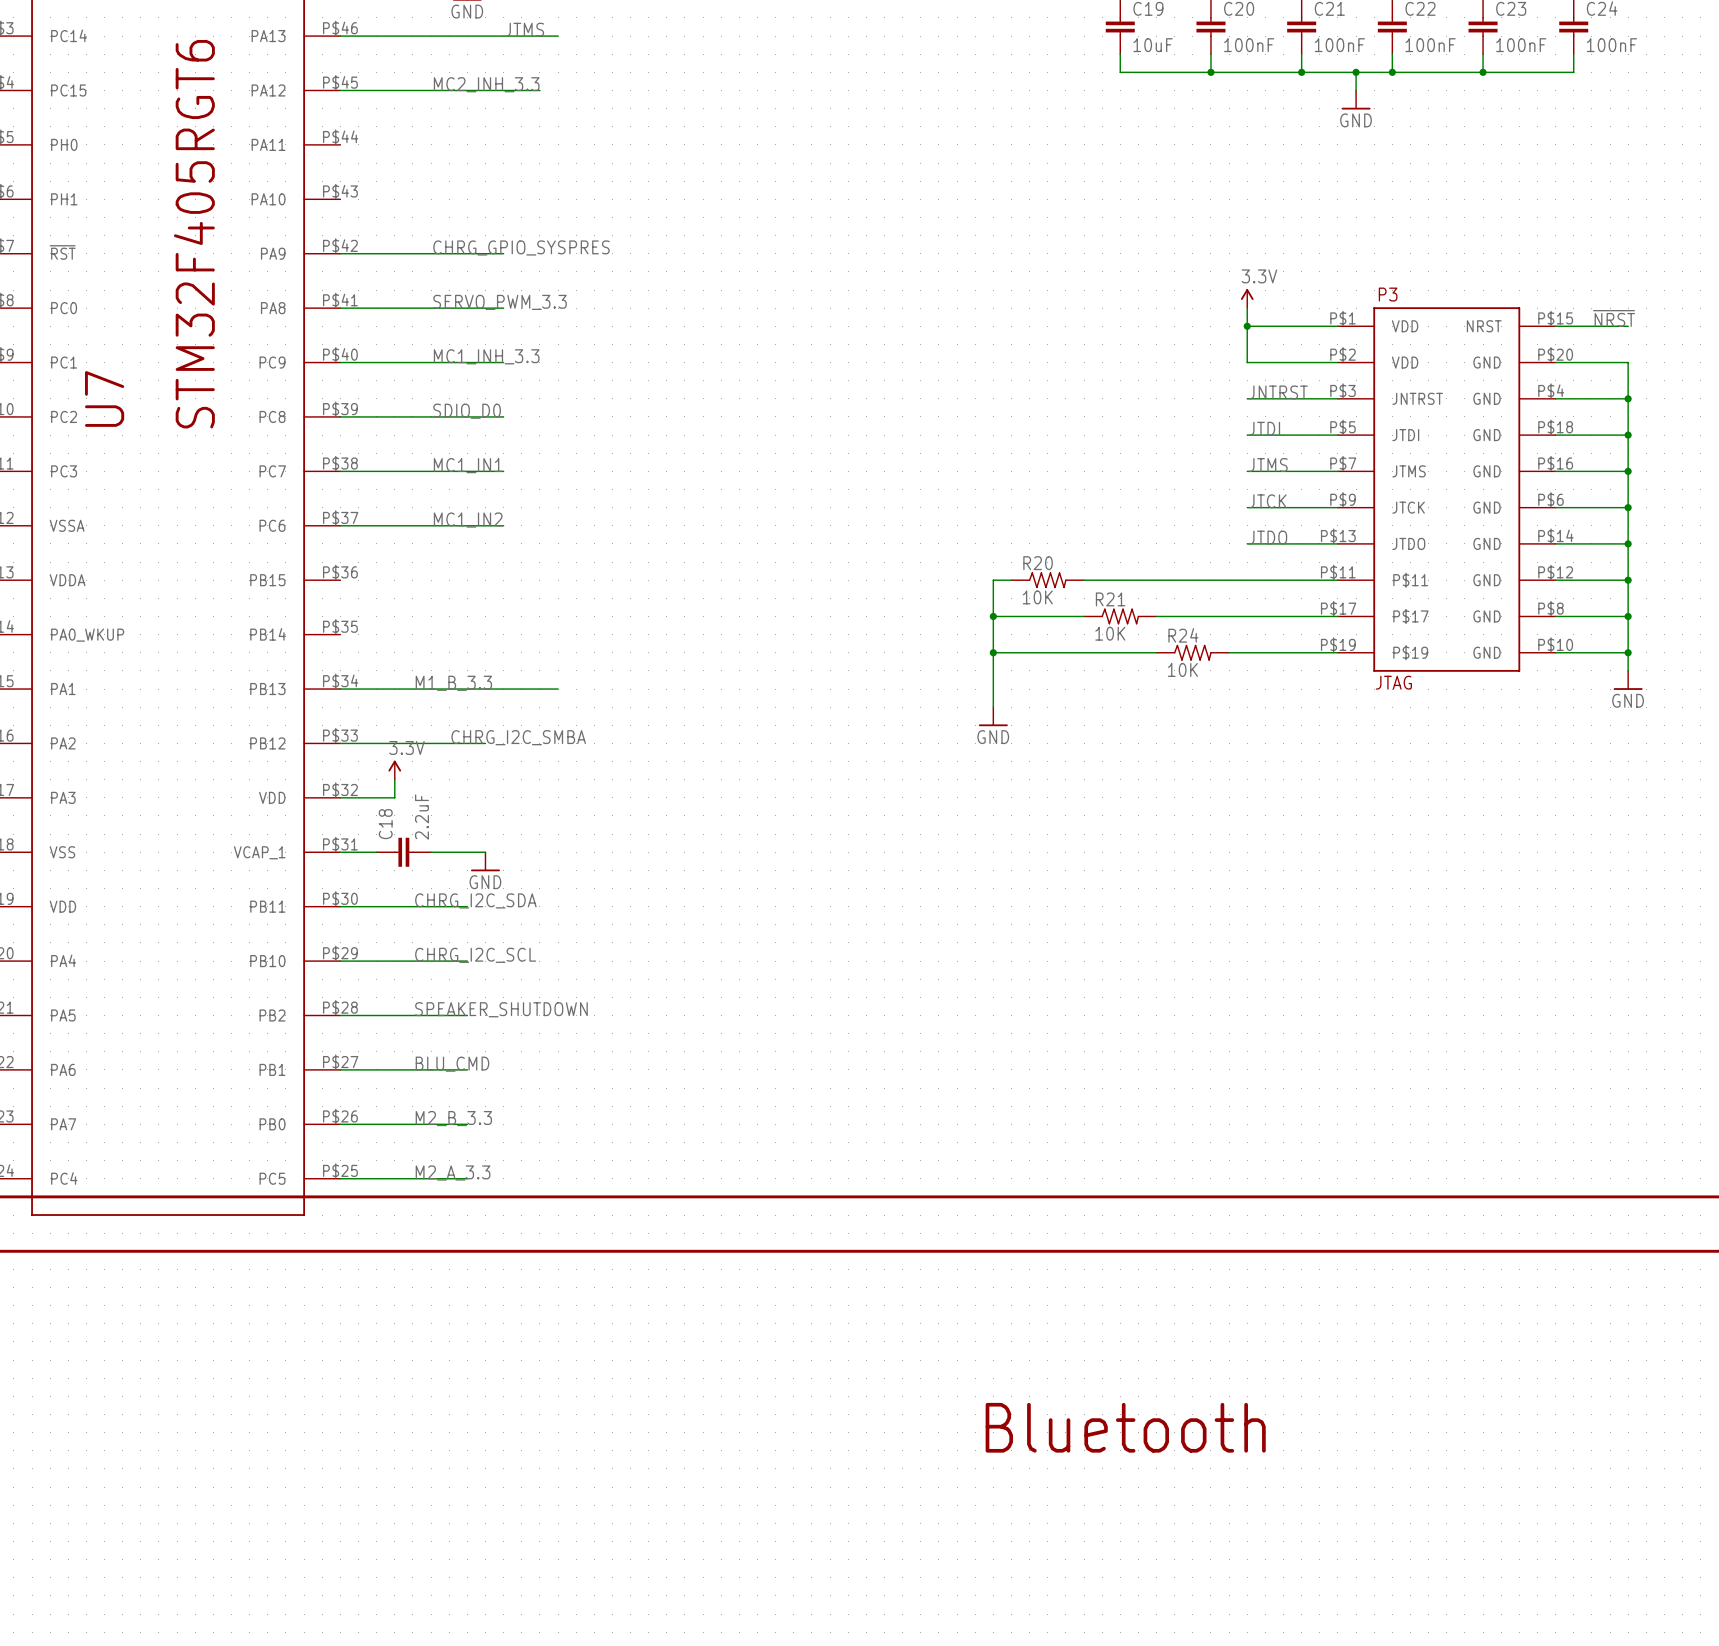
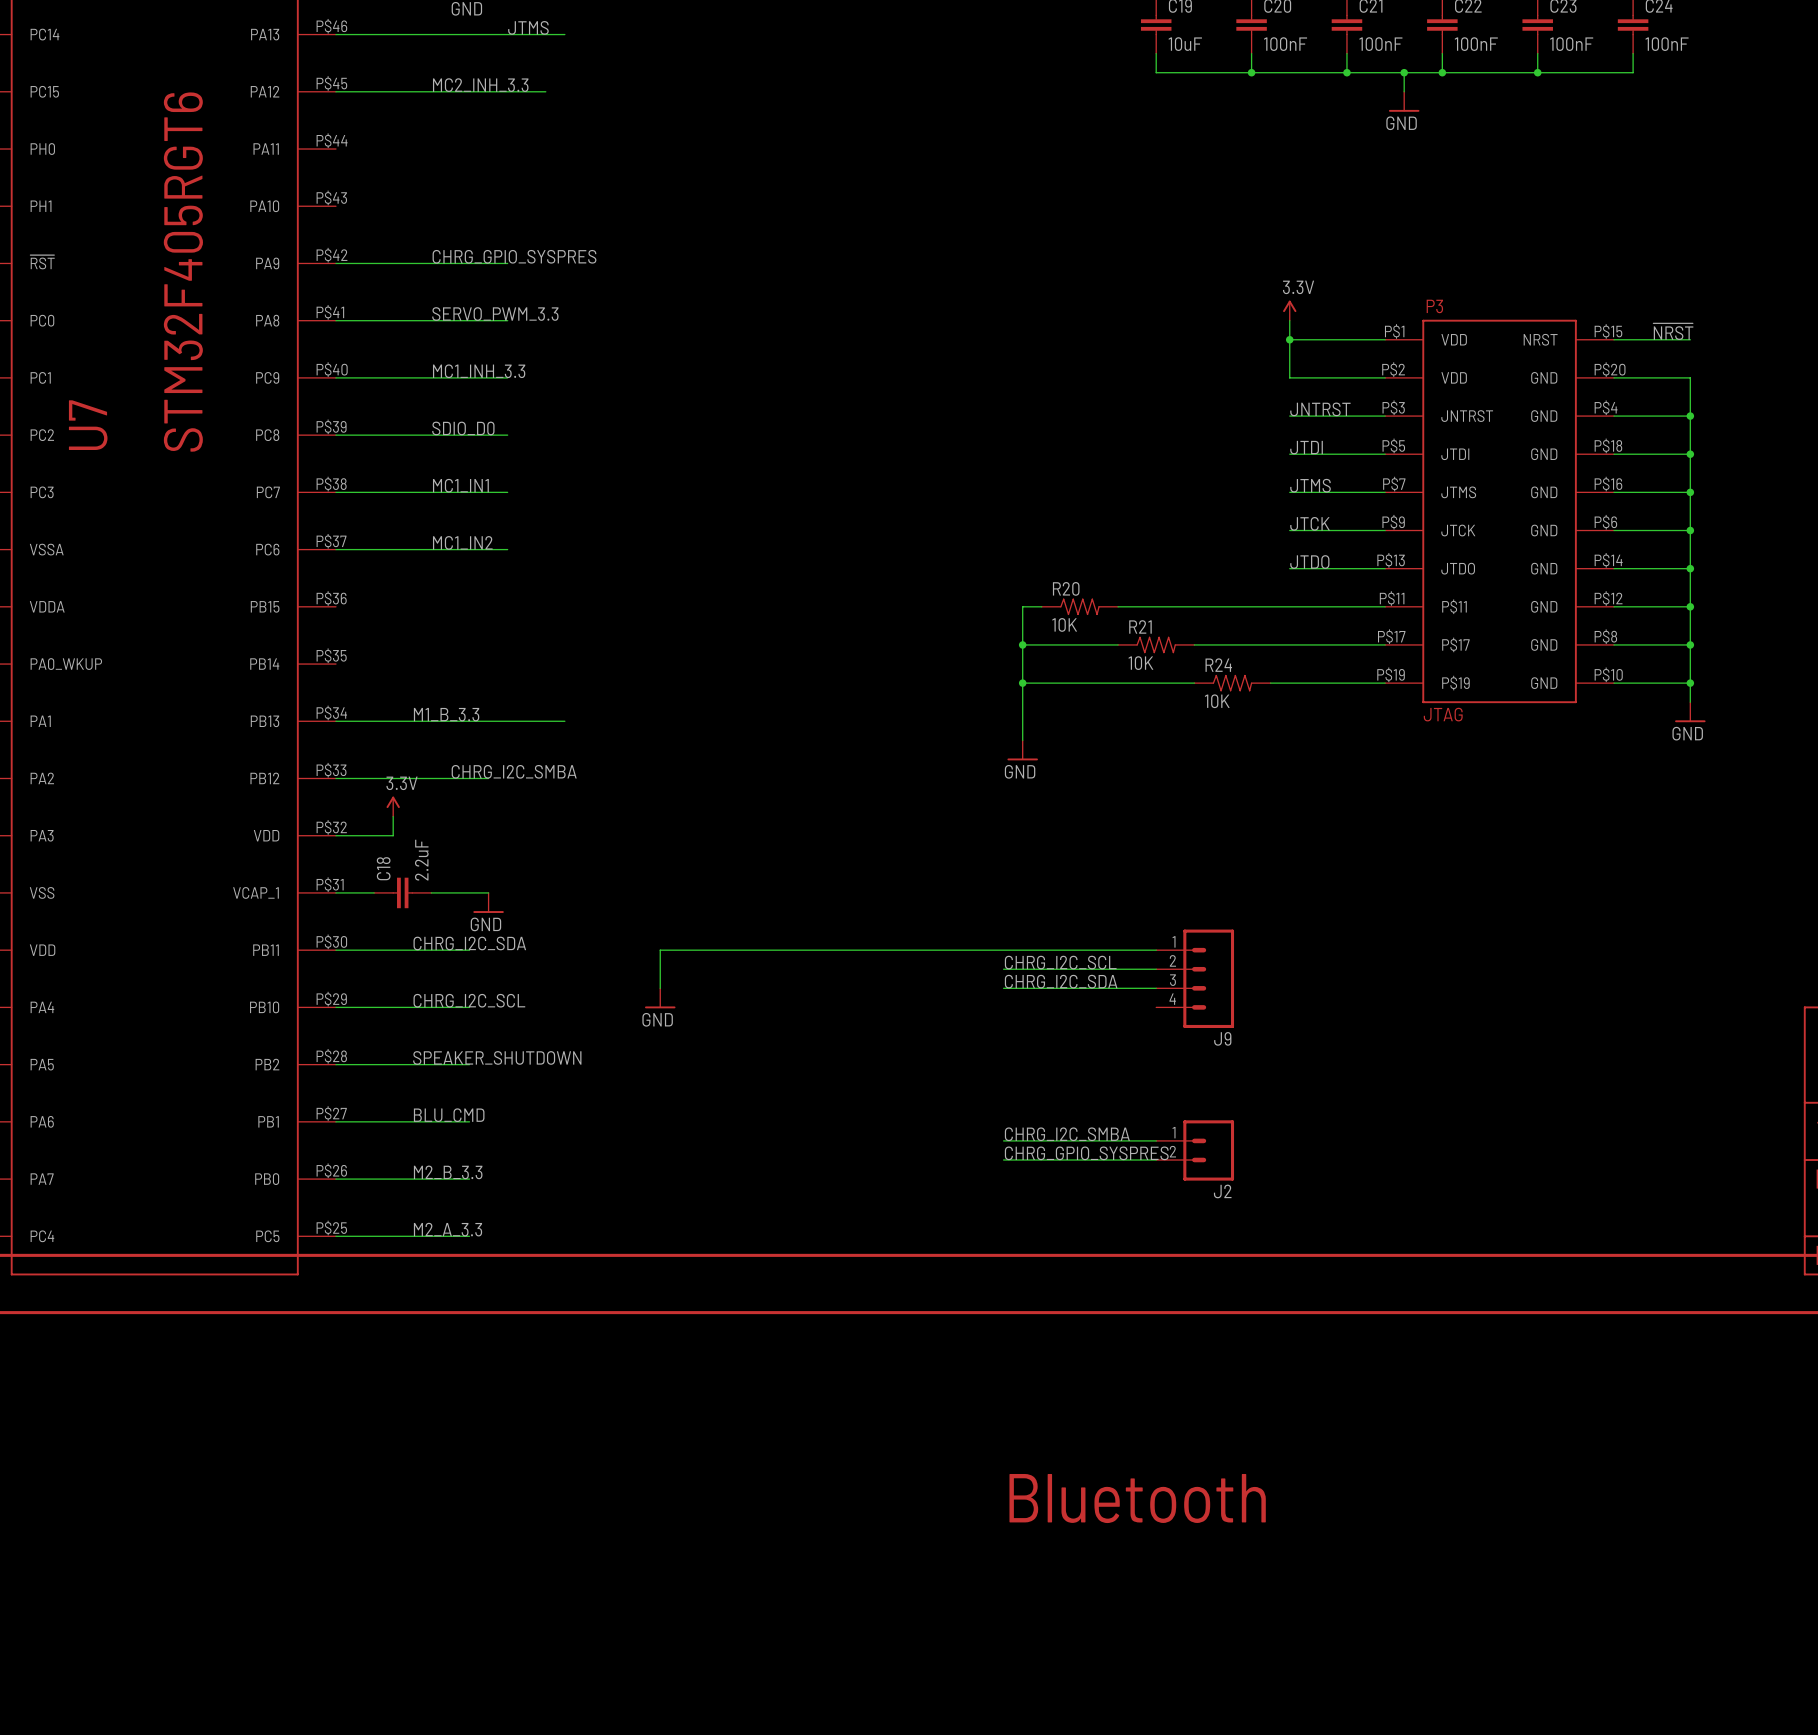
wire: none -> (1156, 950) (660, 950) (660, 988)
label: none -> CHRG_I2C_SCL (1060, 962)
wire: none -> (1003, 969) (1156, 969)
J9: none -> (1195, 978)
label: none -> CHRG_I2C_SDA (1061, 981)
wire: none -> (1003, 988) (1156, 988)
power symbol: none -> GND (660, 998)
label: none -> CHRG_I2C_SMBA (1067, 1134)
wire: none -> (1003, 1140) (1156, 1140)
J2: none -> (1195, 1150)
label: none -> CHRG_GPIO_SYSPRES (1086, 1153)
wire: none -> (1003, 1160) (1156, 1160)

